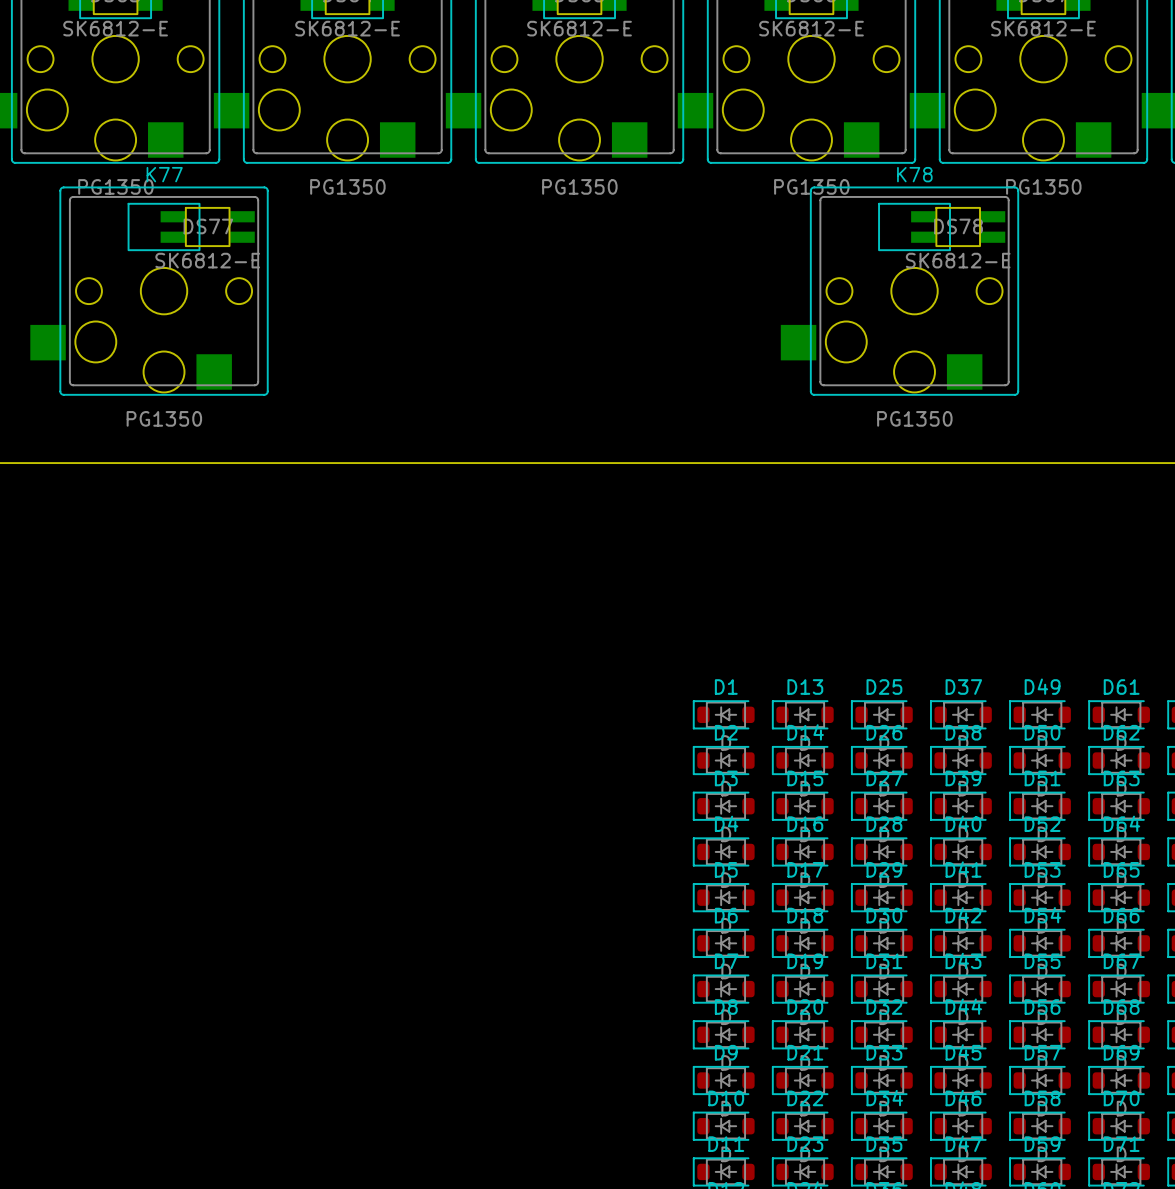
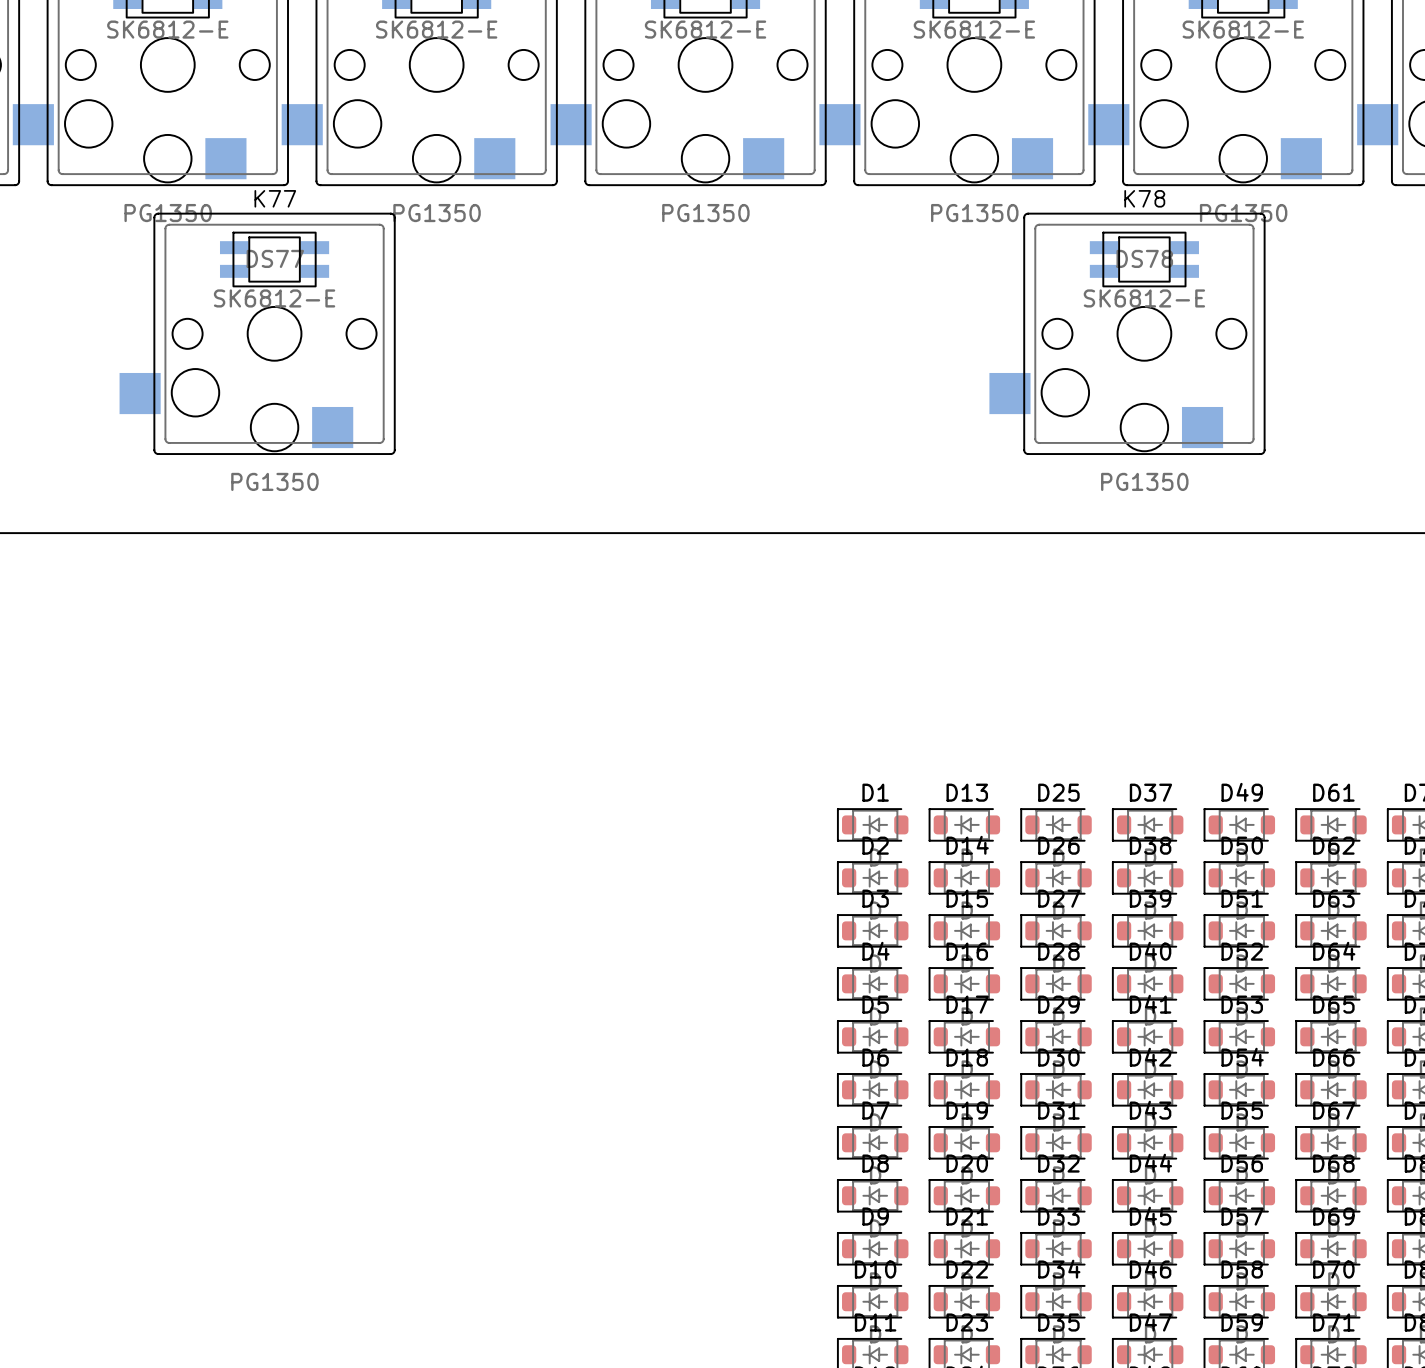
K77 position: (149, 291) -> (257, 333)
K78 position: (899, 291) -> (1127, 333)

